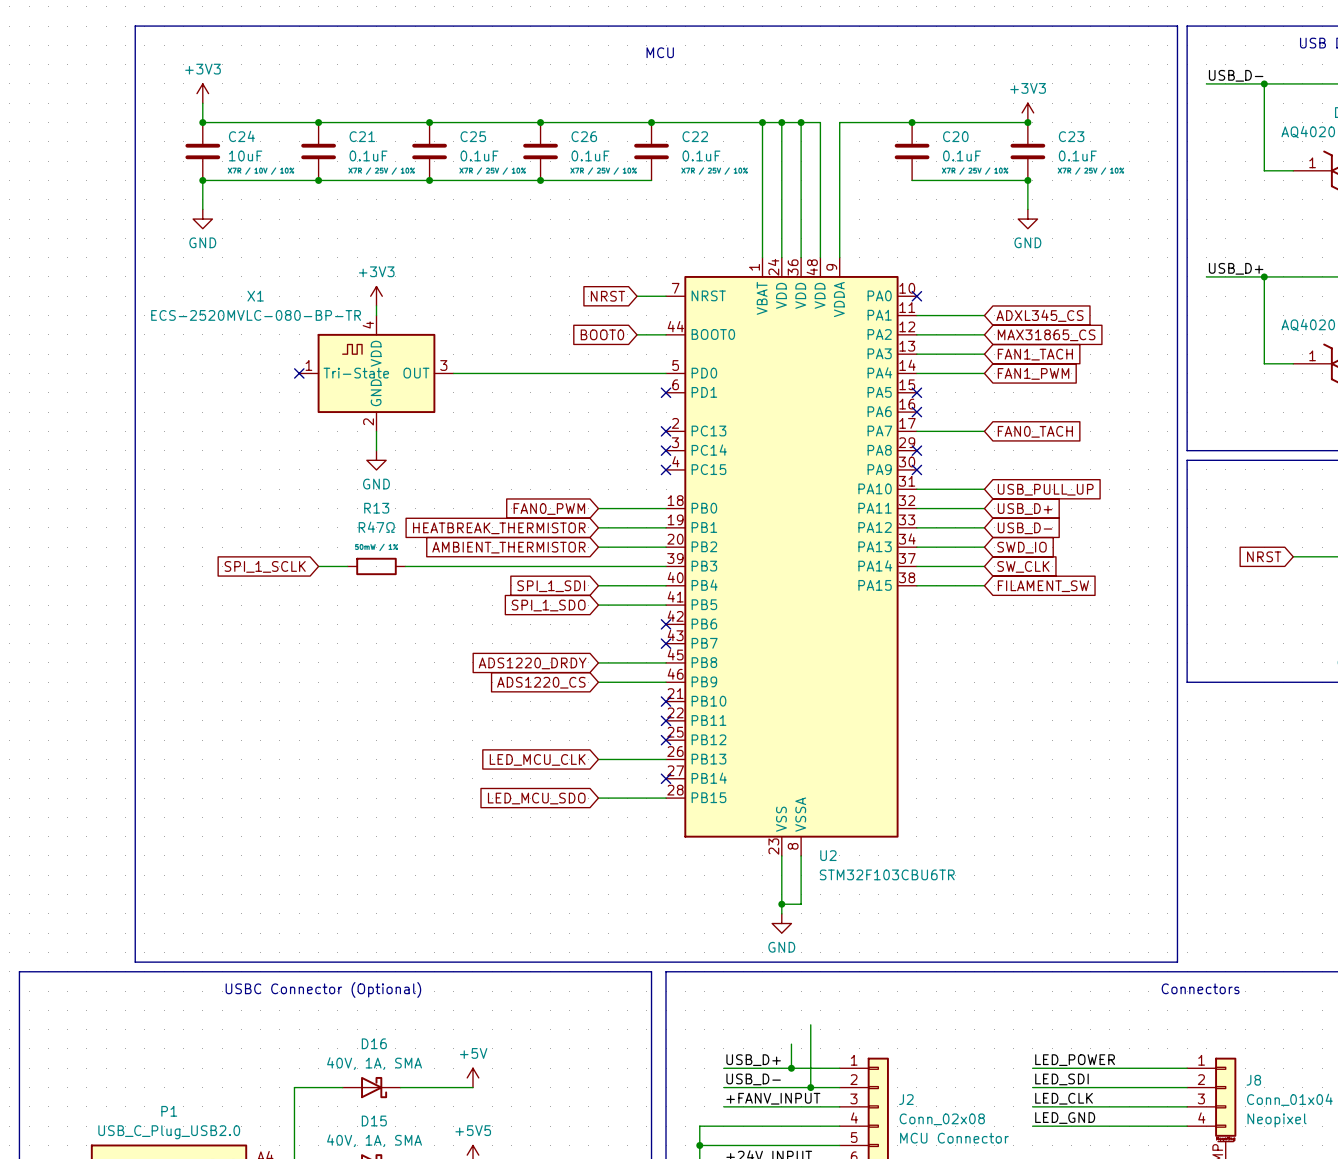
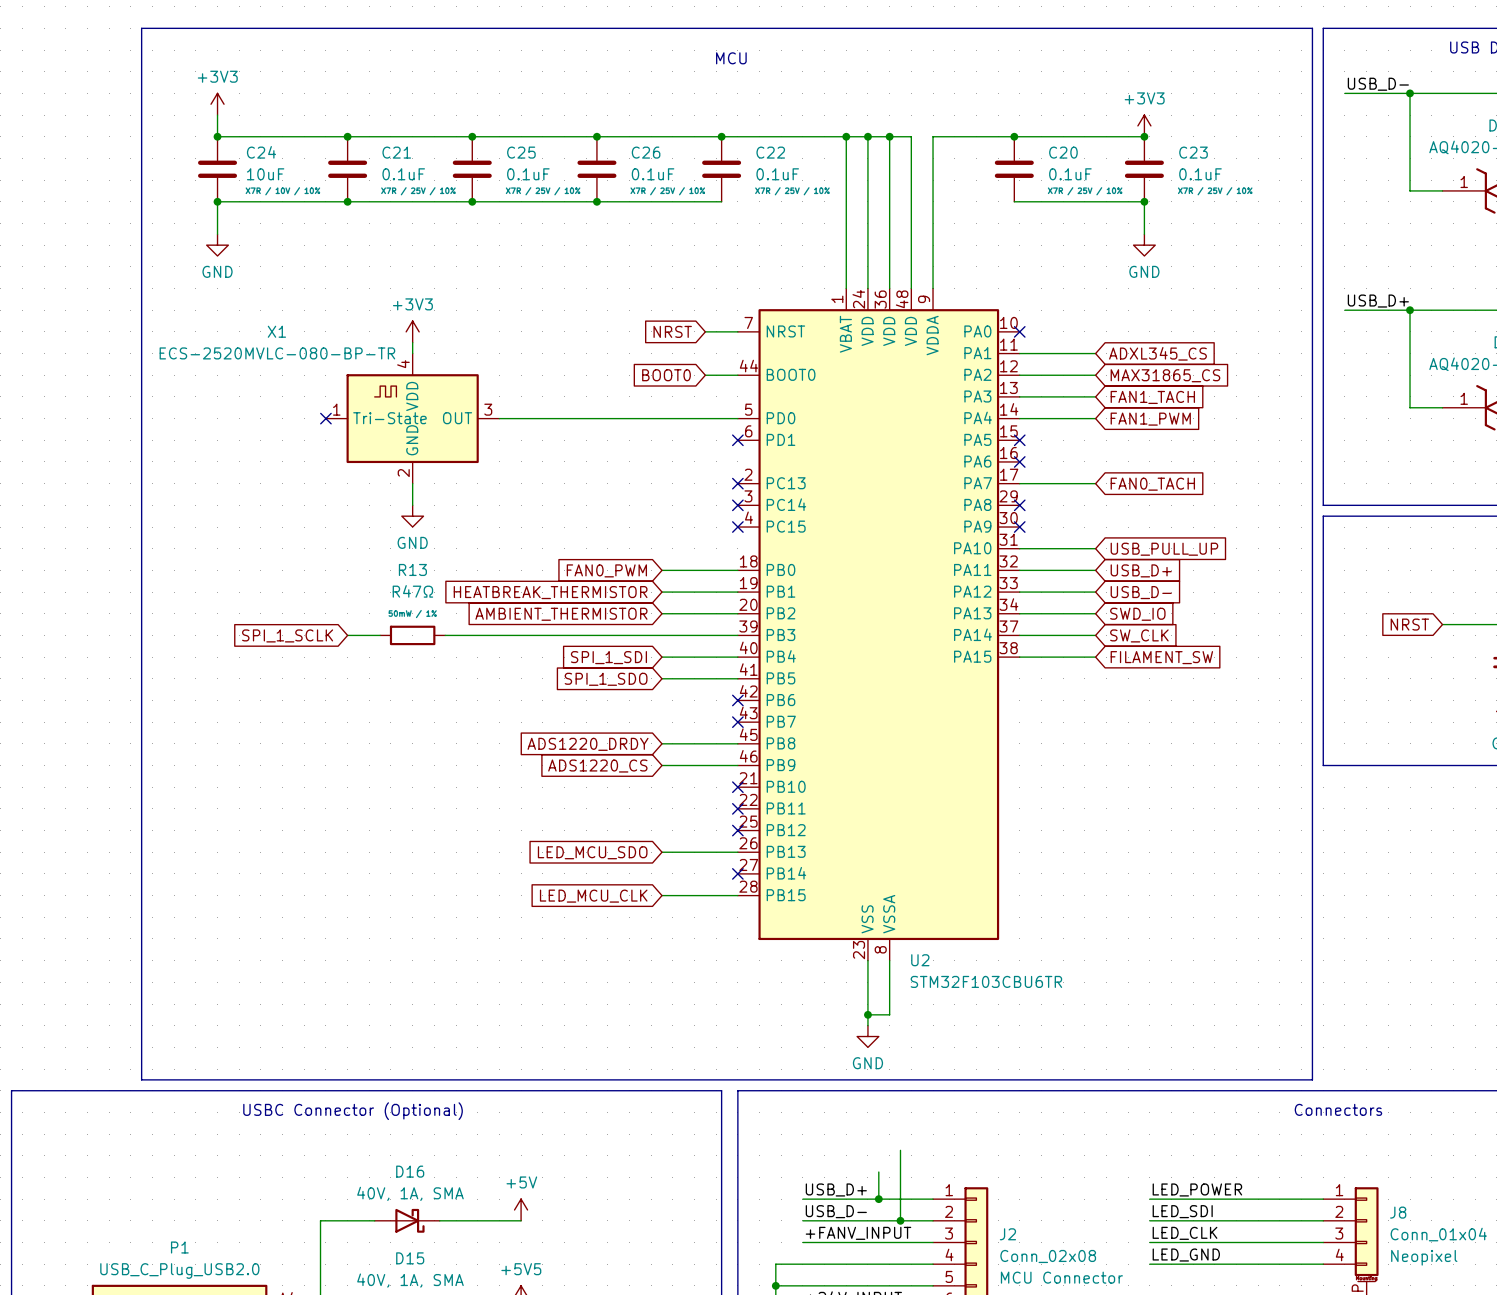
global label: LED_MCU_CLK (537, 759) -> LED_MCU_SDO (592, 852)
global label: LED_MCU_SDO (536, 798) -> LED_MCU_CLK (593, 896)

